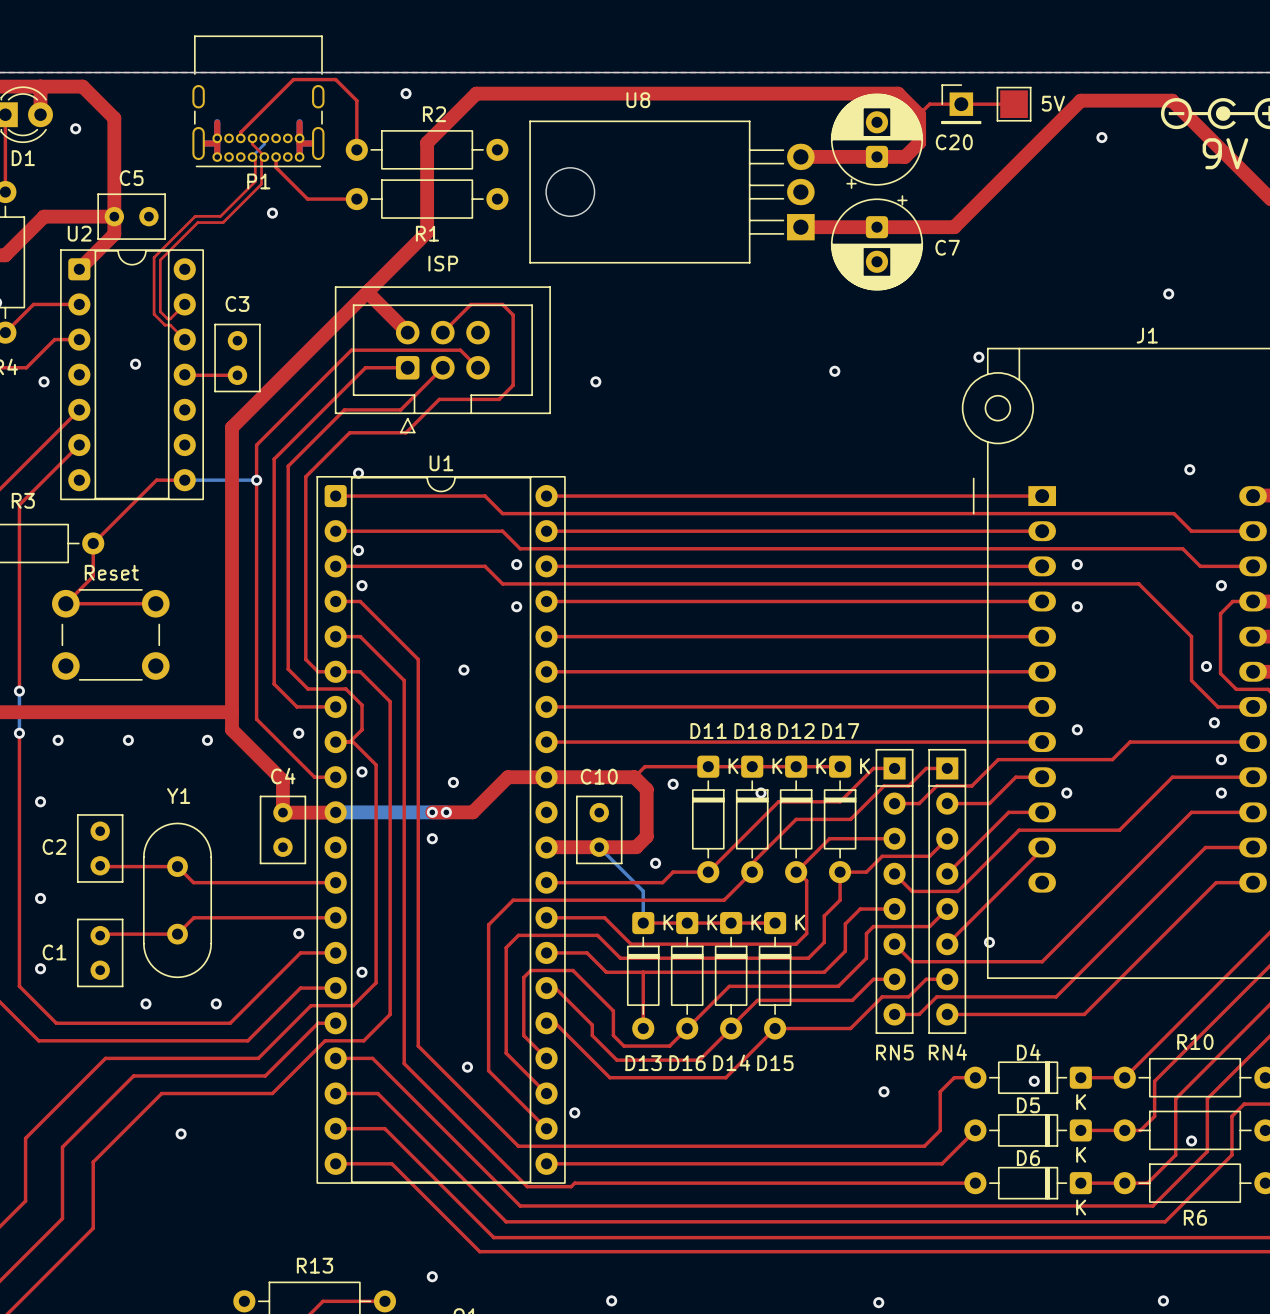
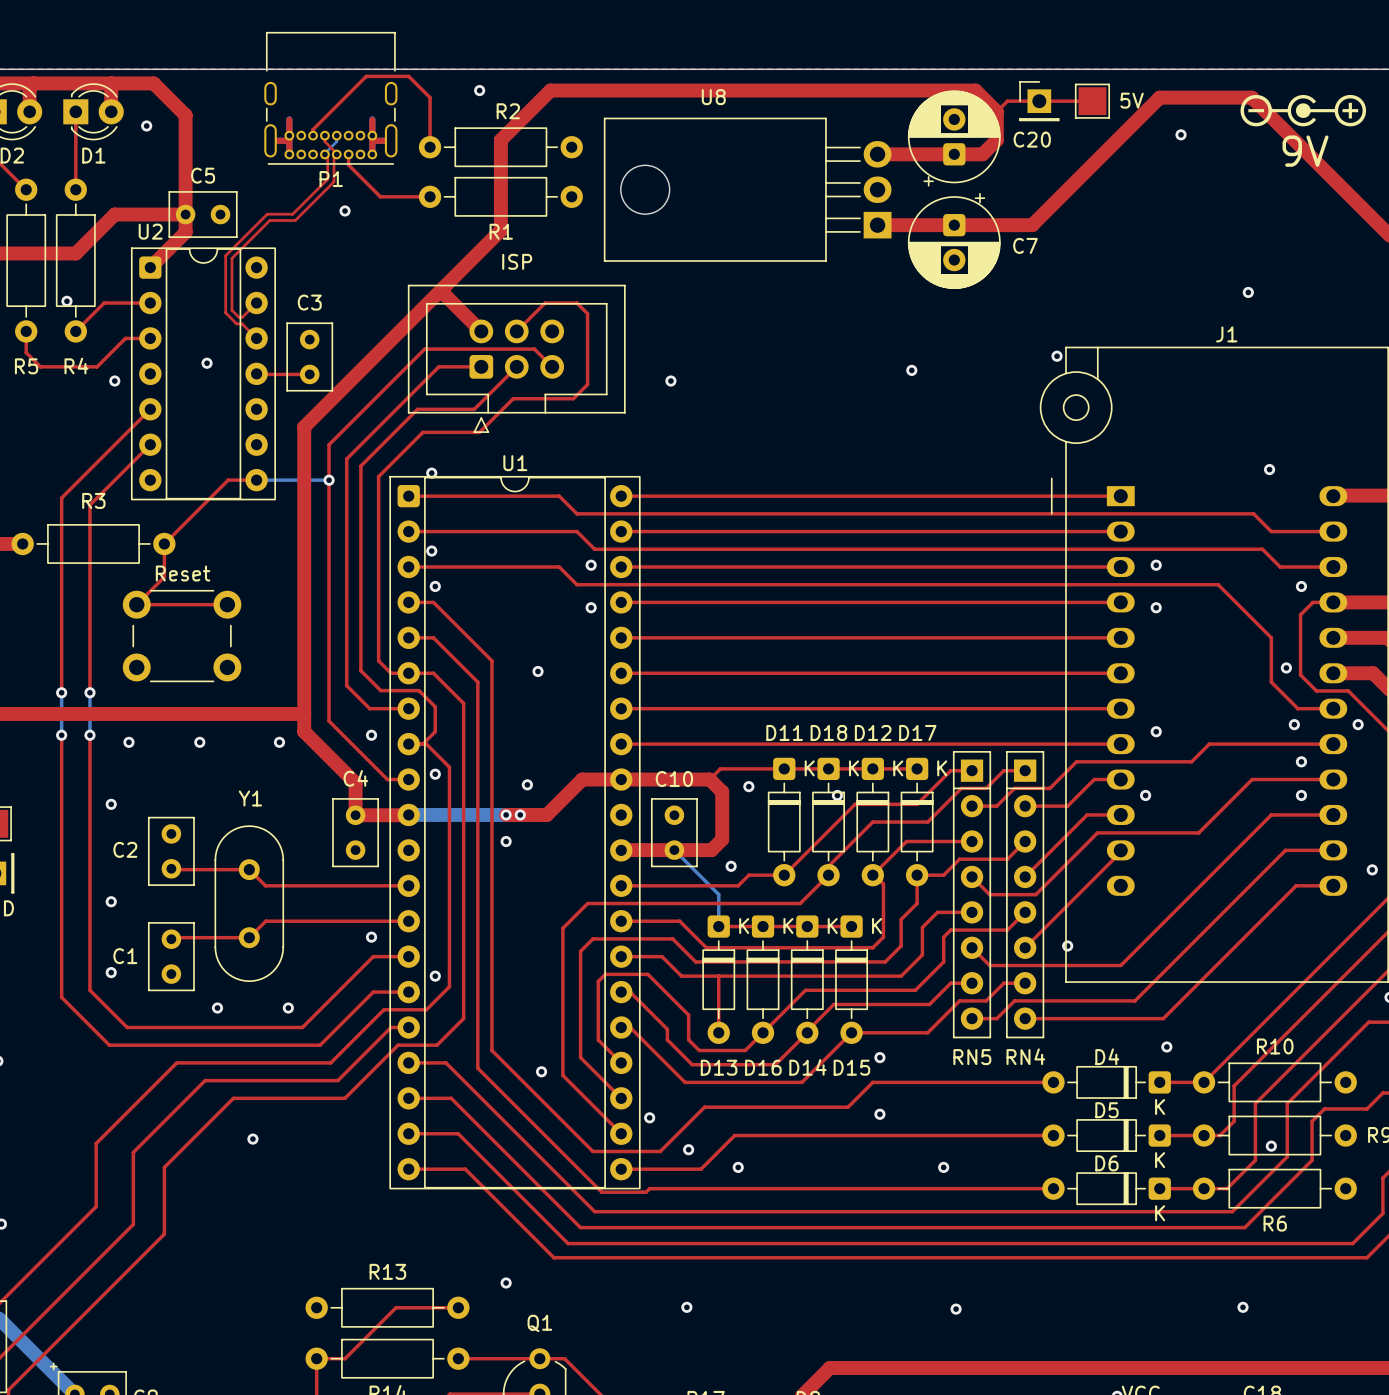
via: none -> (879, 1057)
top track: (954, 1077) (940, 1091) (940, 1130) (924, 1146) (585, 1146) -> (1032, 1082) (872, 1082) (848, 1107) (704, 1107) (660, 1151)
via position: (1034, 1081) -> (1166, 1046)
via: (884, 1091) -> none
via: none -> (879, 1114)
top track: (975, 1130) (942, 1163) (625, 1163) -> (1053, 1135) (734, 1135) (701, 1169)
via: none -> (688, 1149)
via: none -> (738, 1167)
via: none -> (943, 1167)

